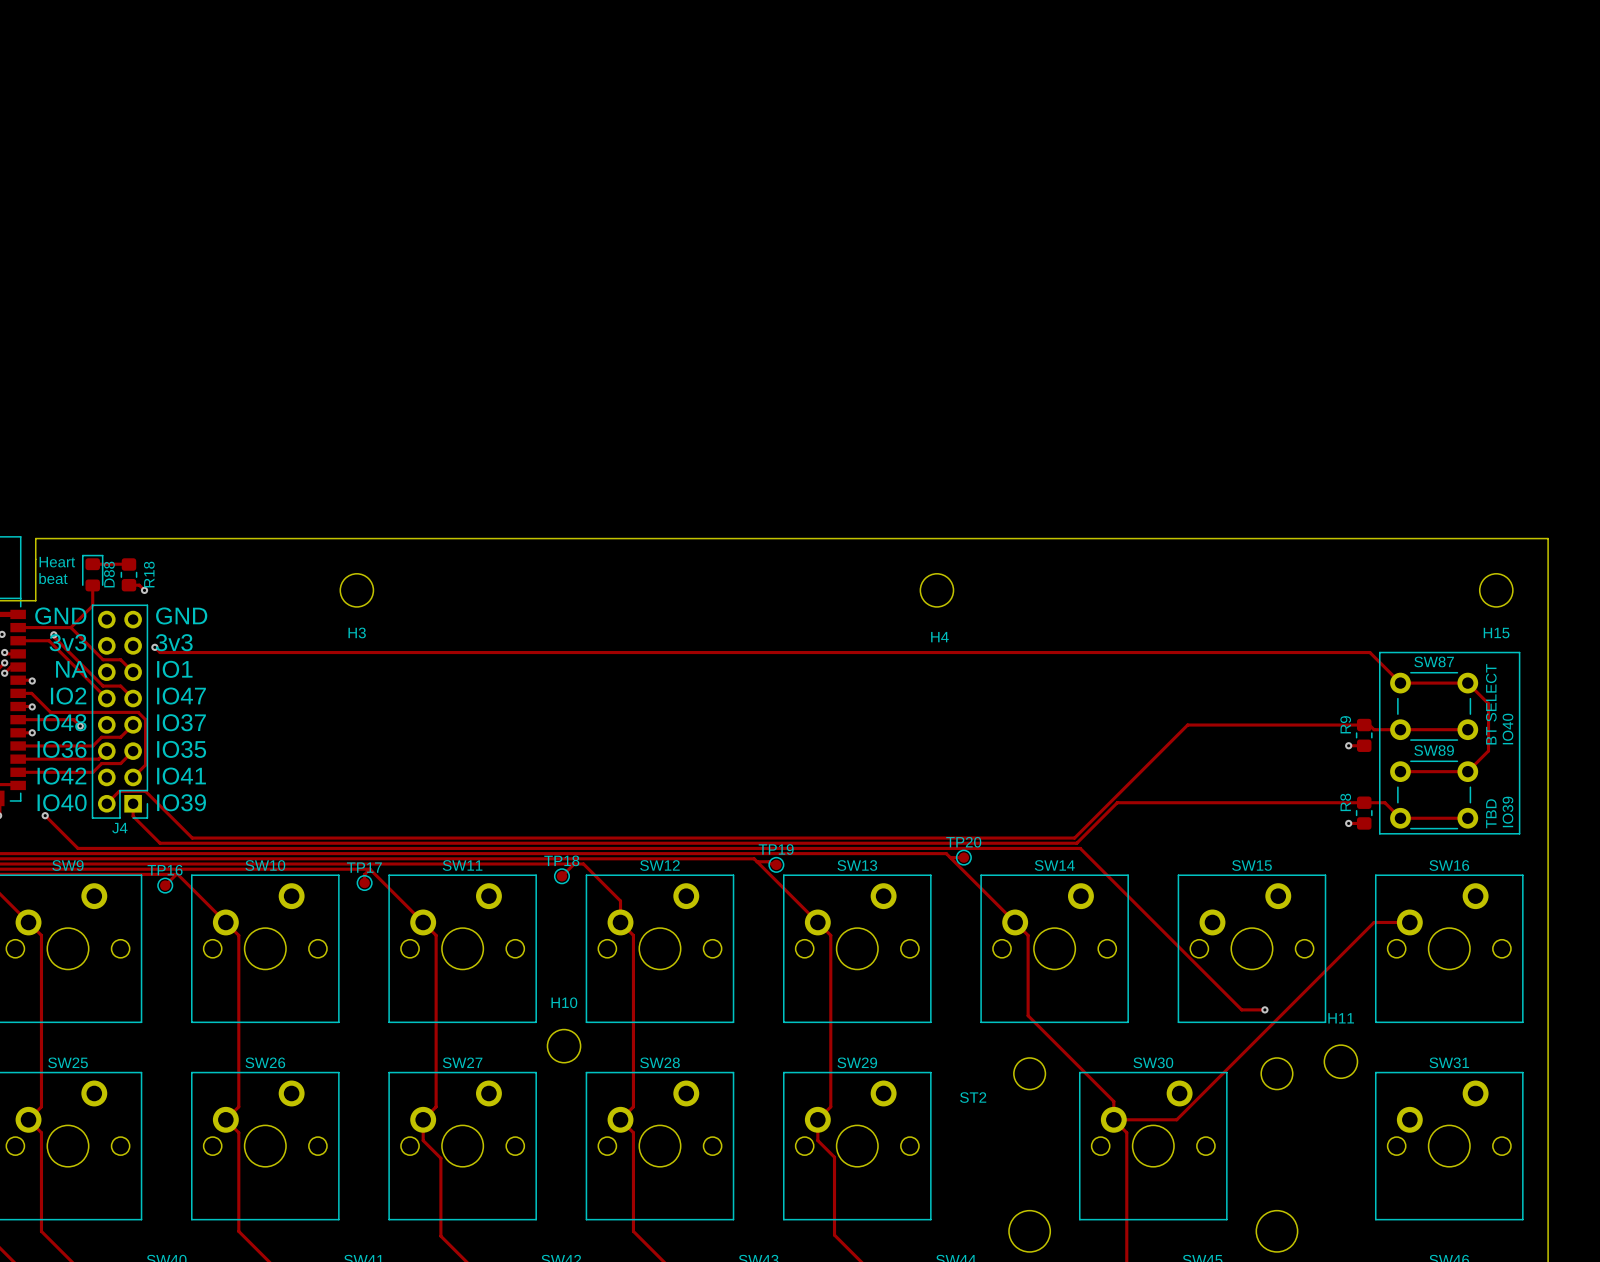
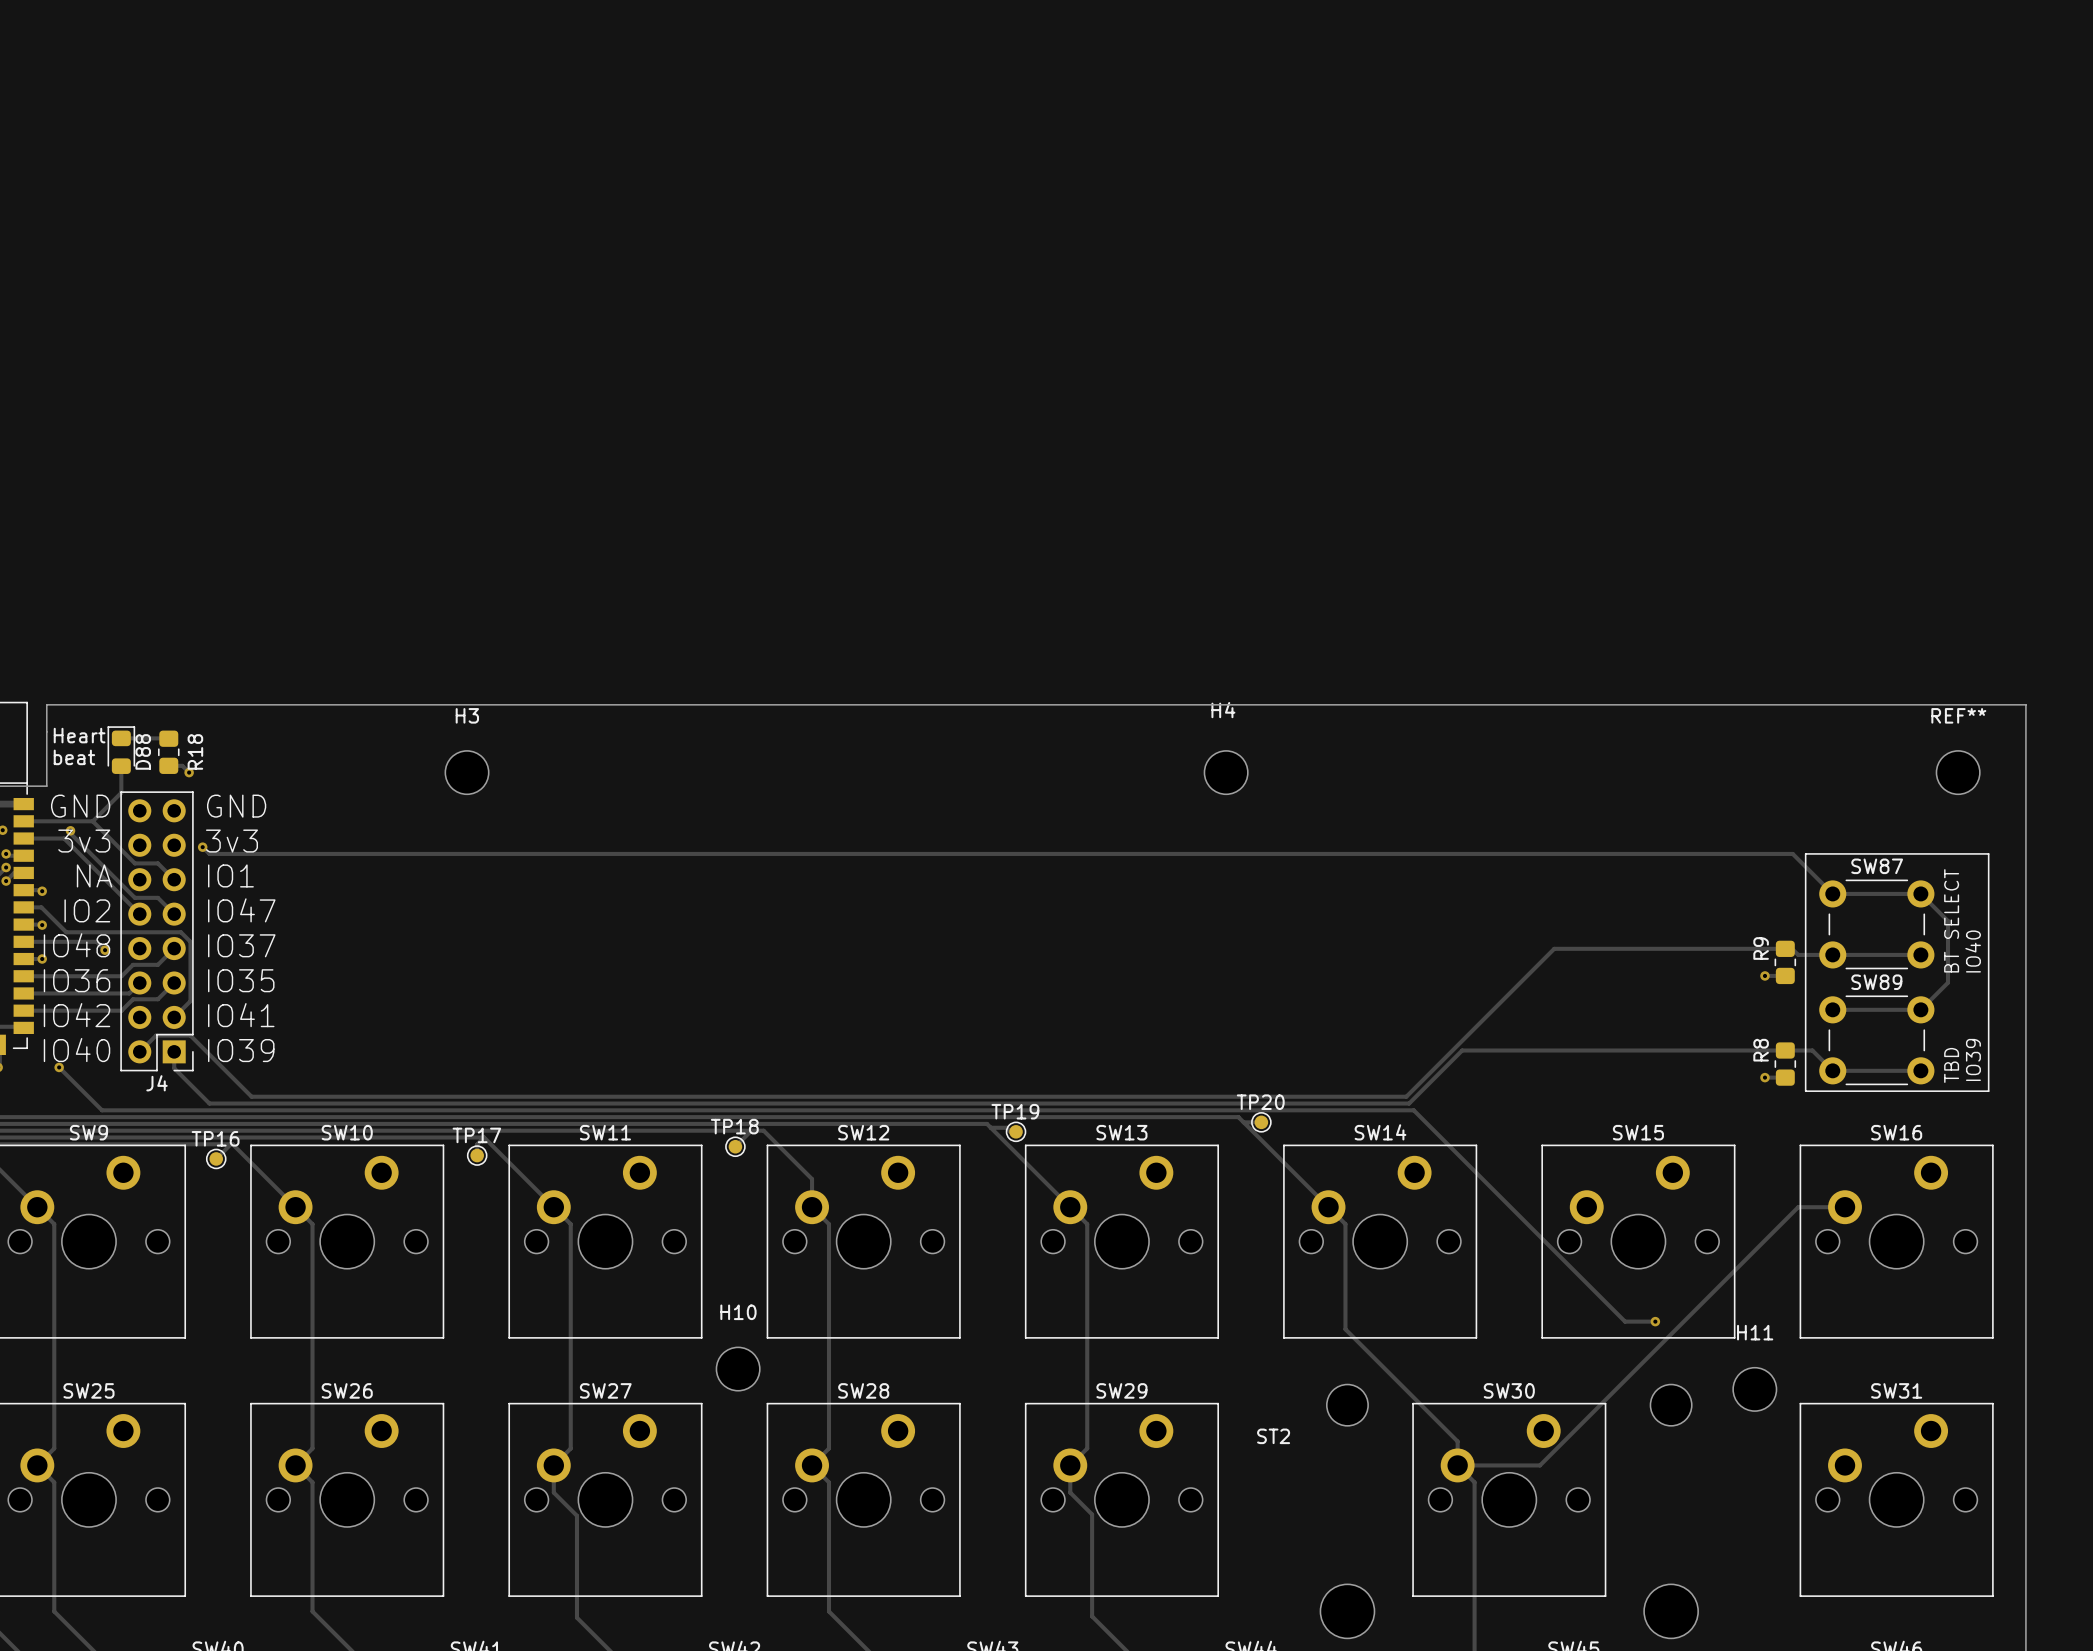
H3 name position: H3 (357, 632) -> H3 (467, 715)
H15 name: H15 (1496, 633) -> REF** (1958, 715)
H4 name position: H4 (939, 637) -> H4 (1223, 710)

